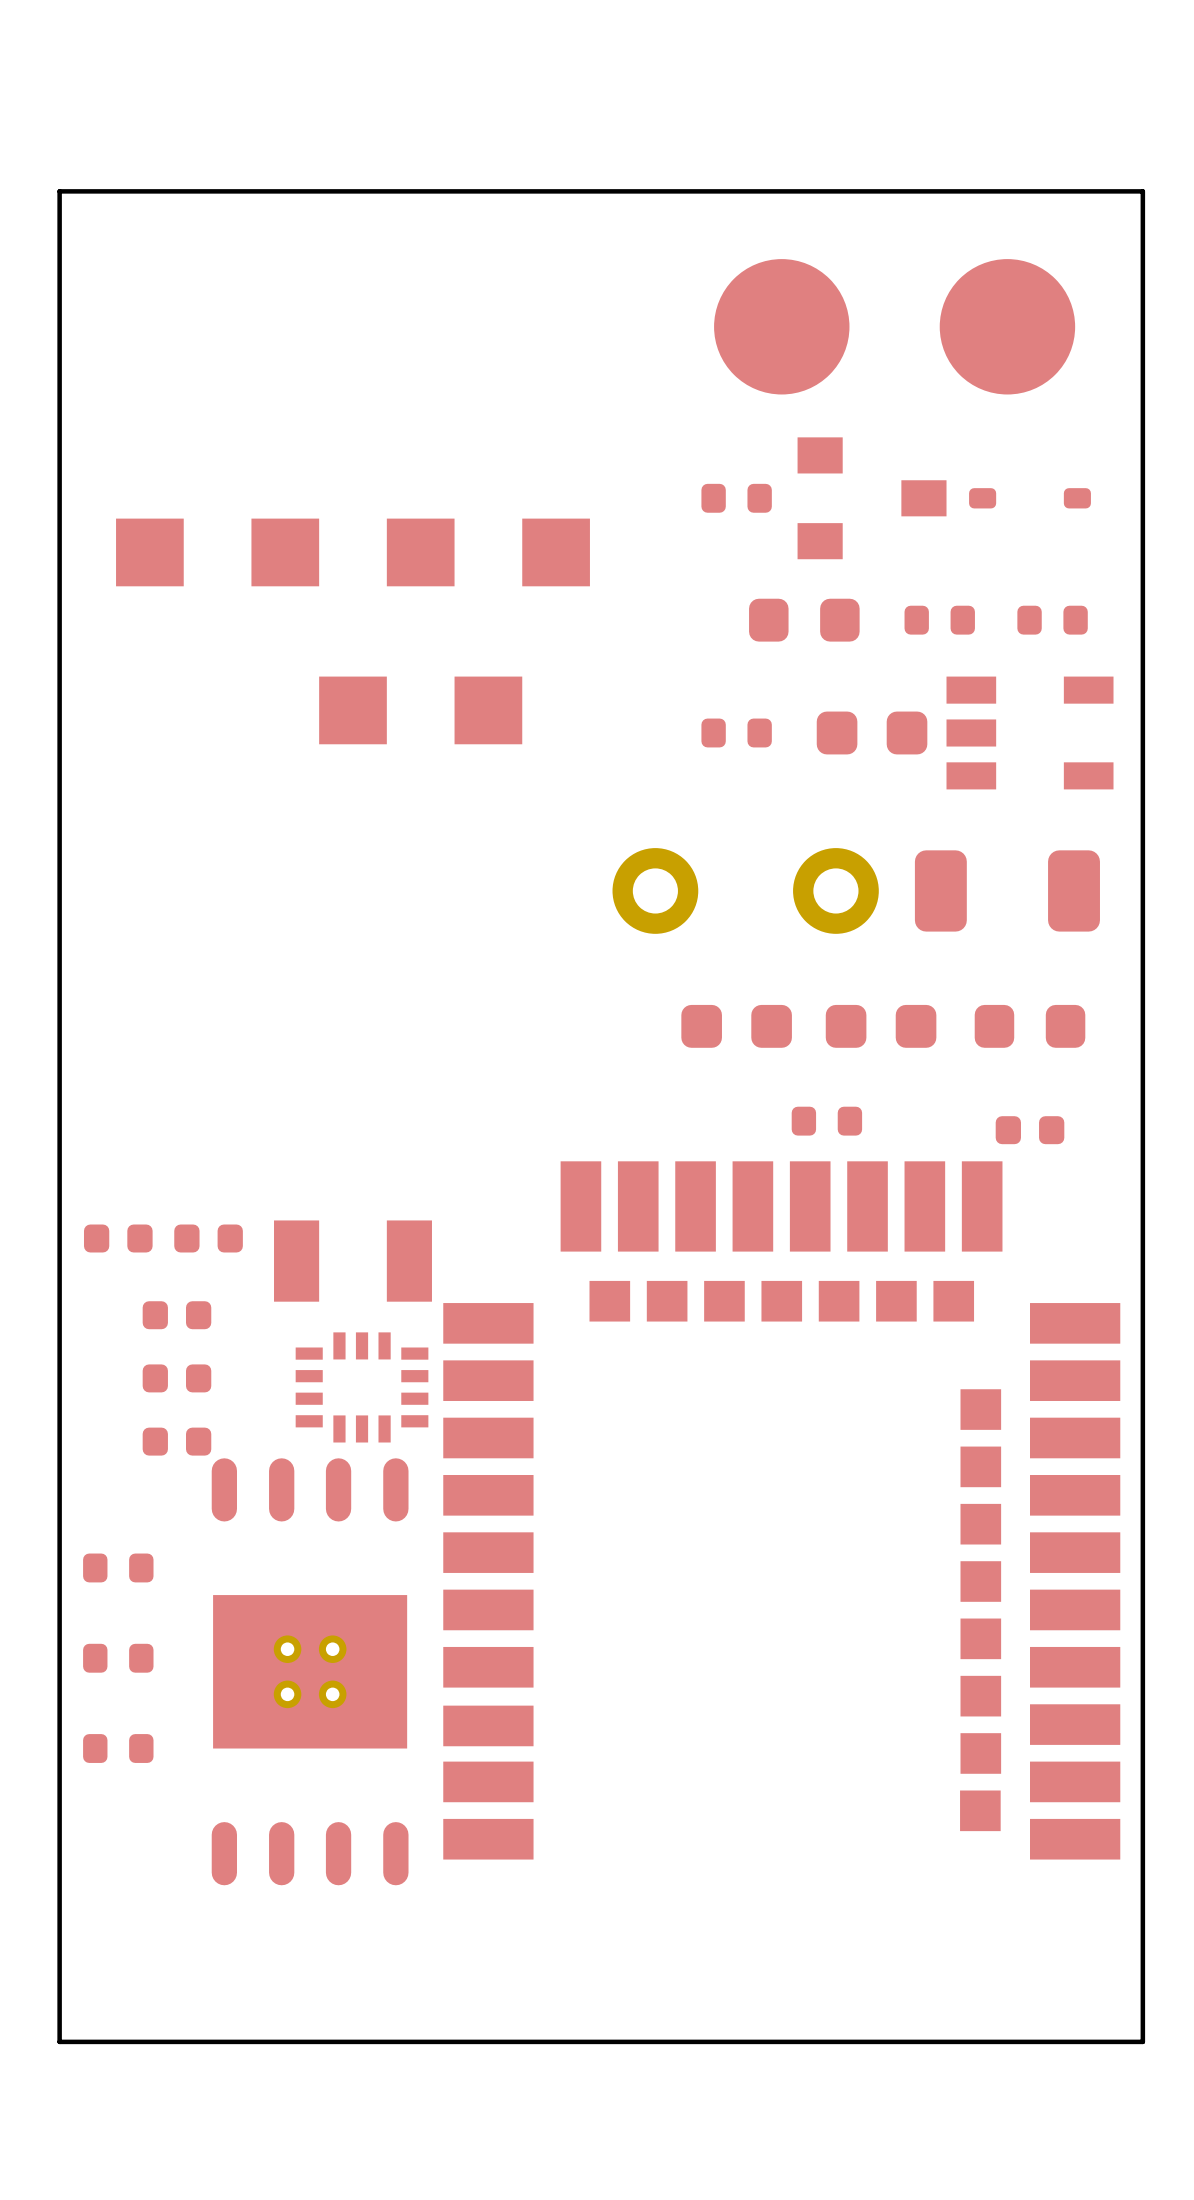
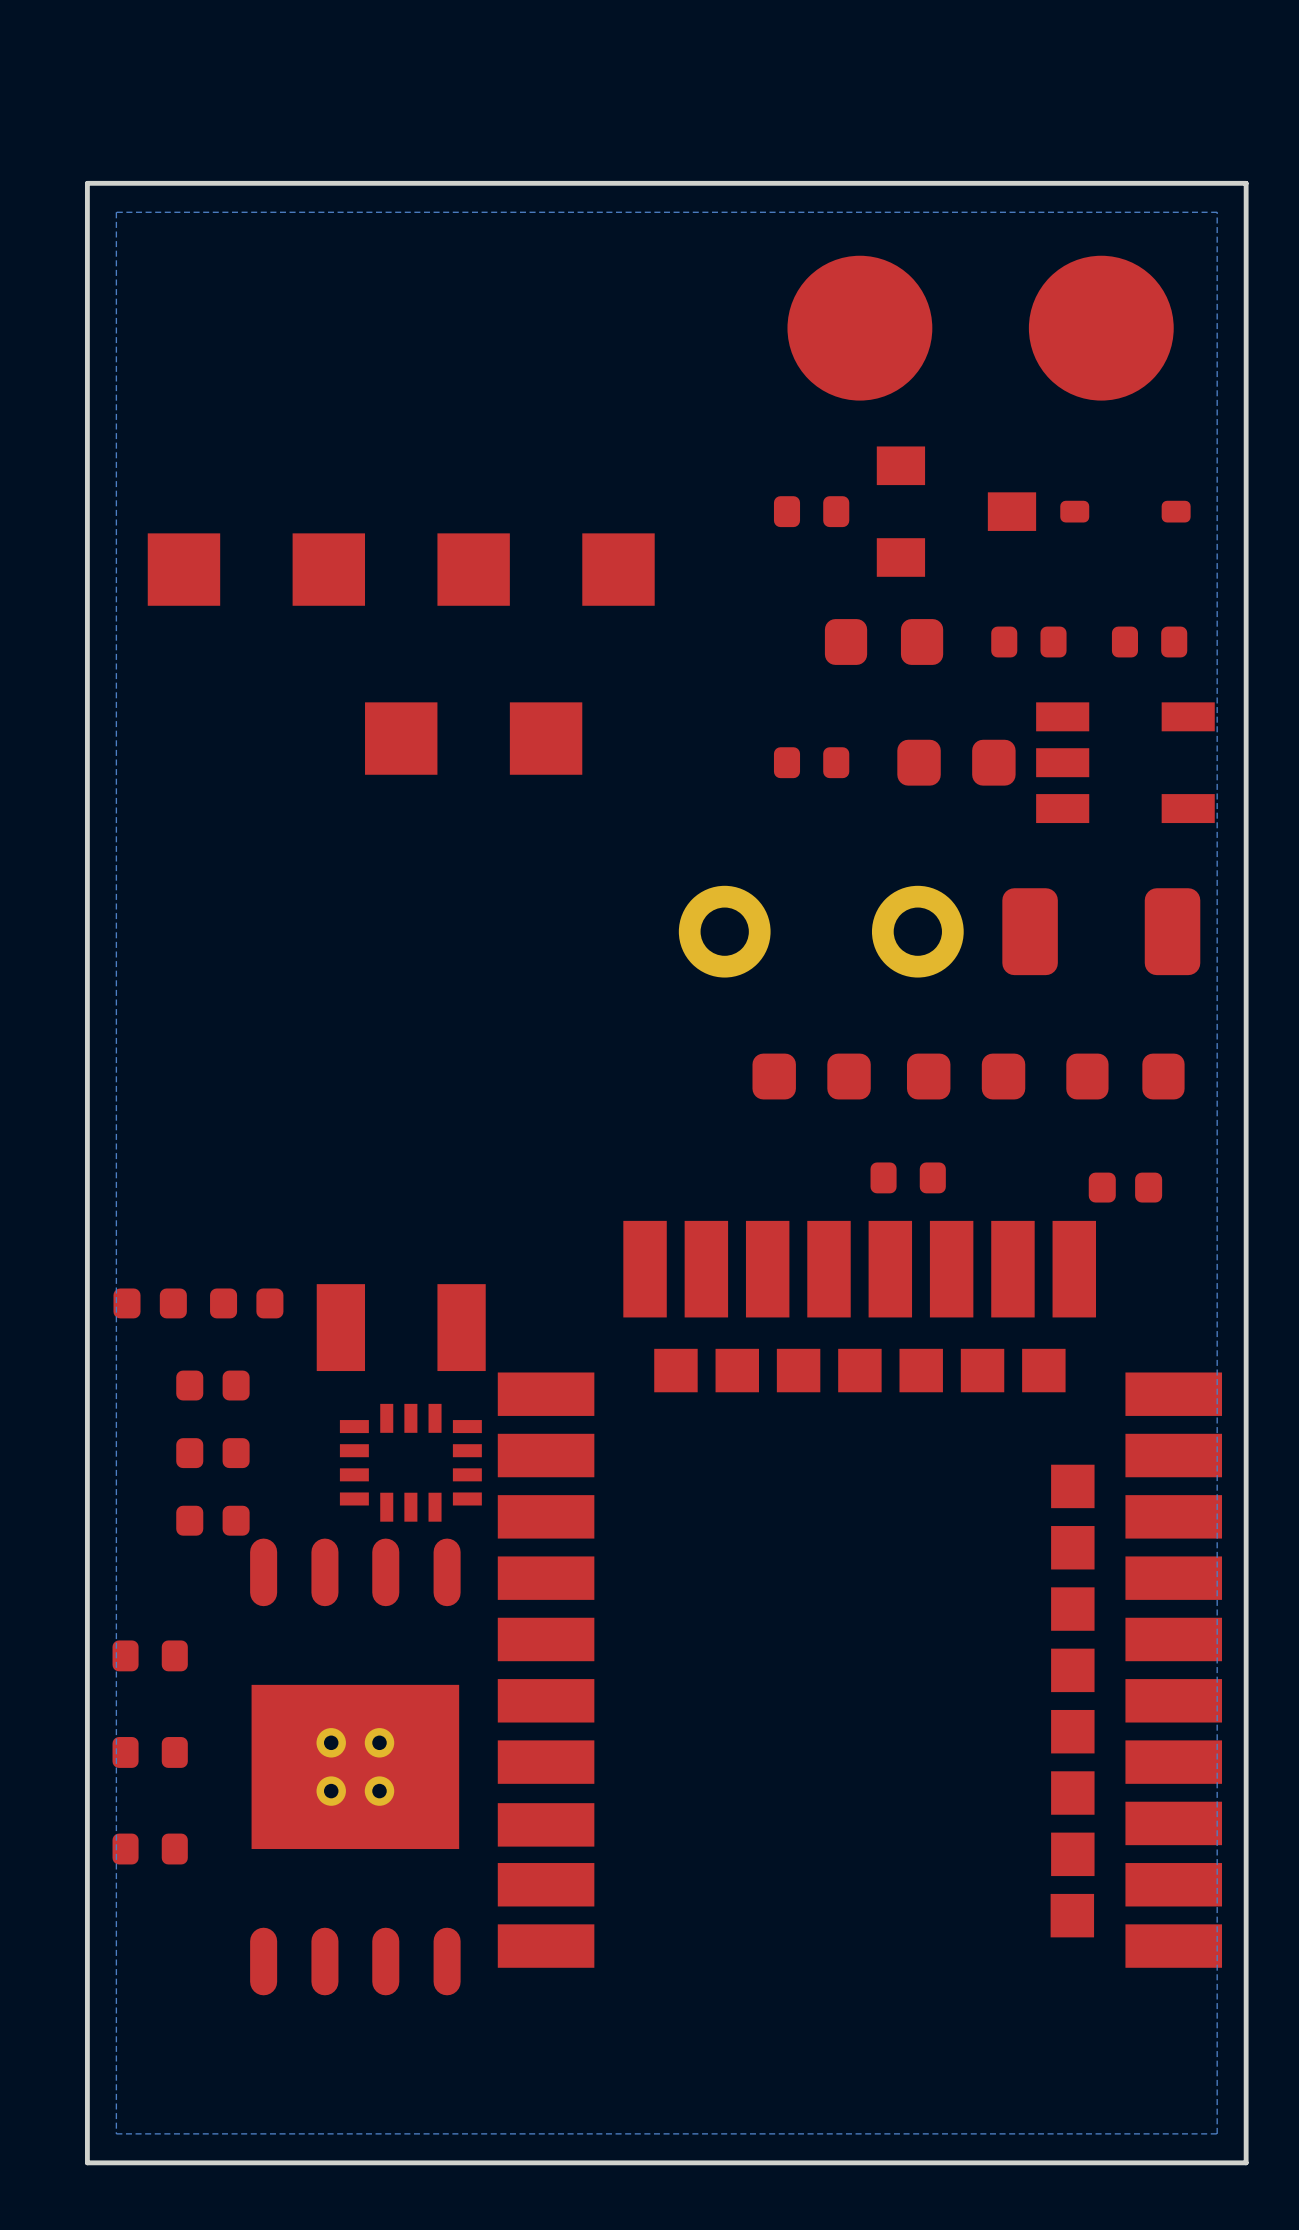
bottom zone outline: none -> (1217, 212) (116, 212) (116, 2133) (1217, 2133) (1217, 212)

